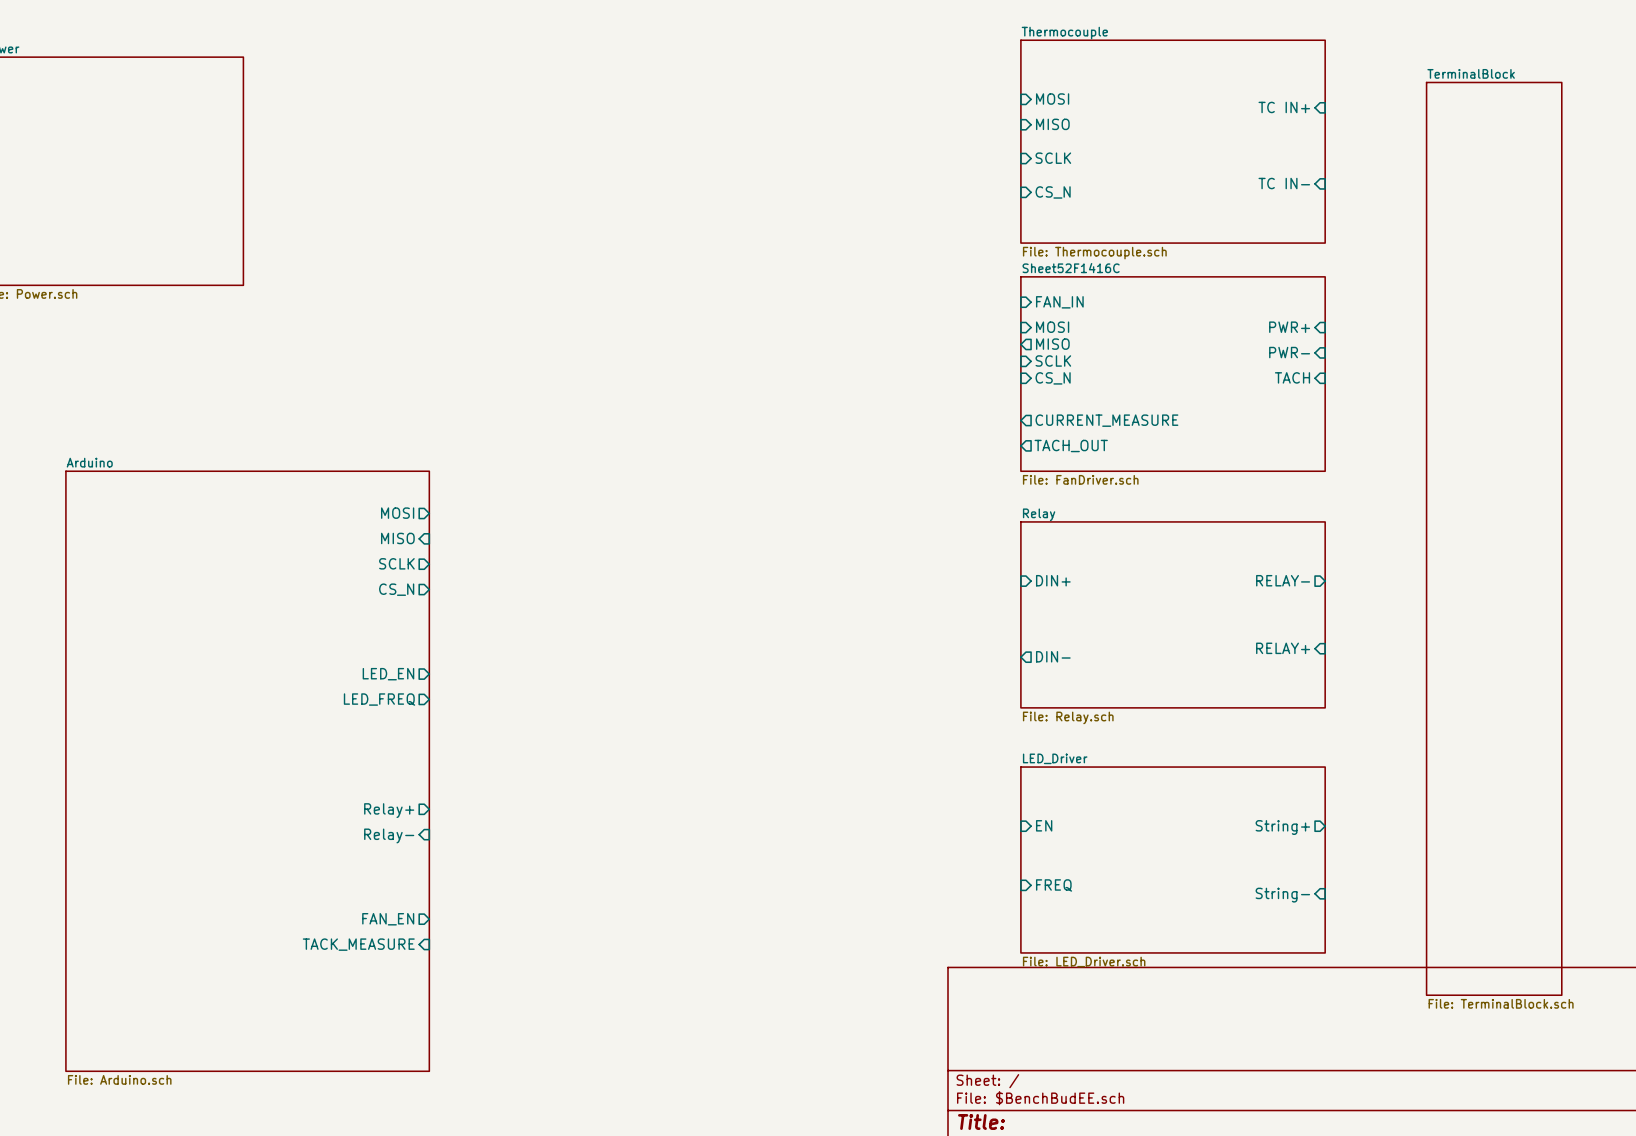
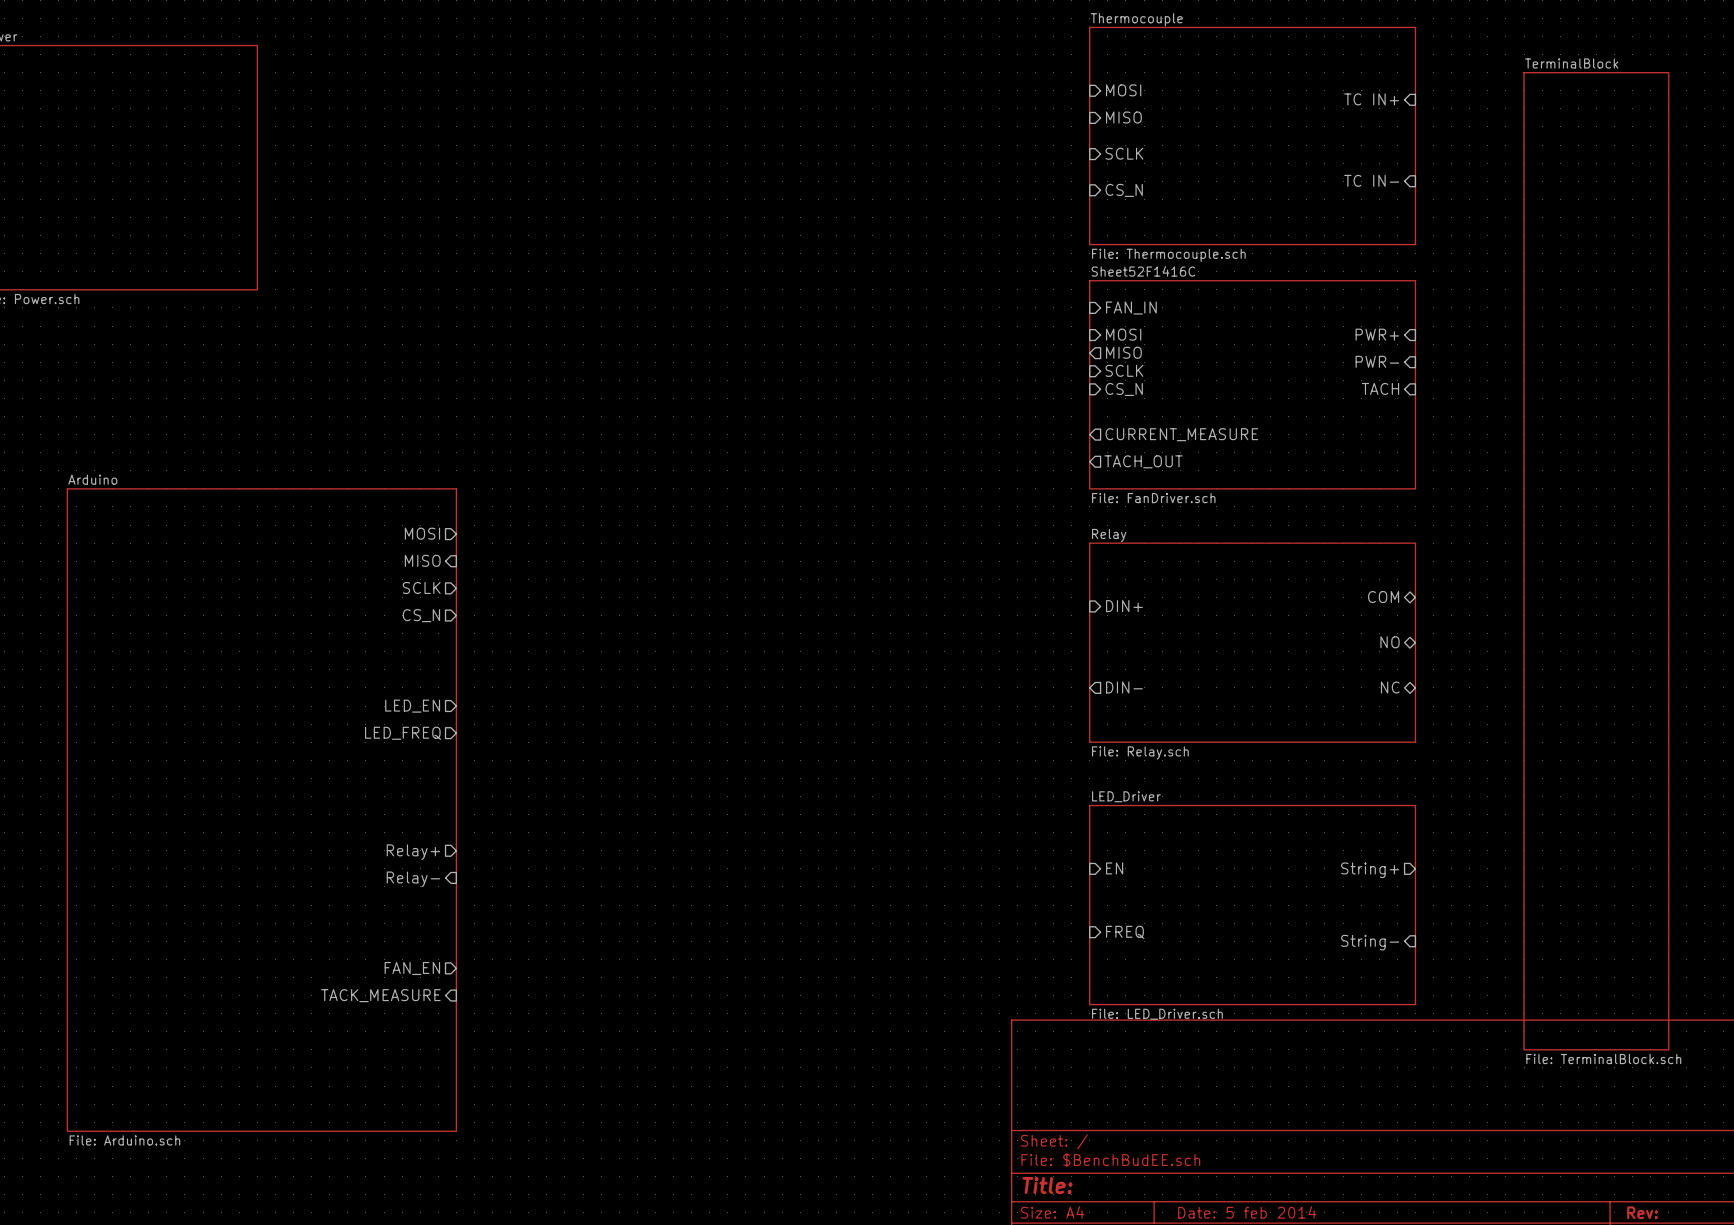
sheet pin: none -> COM (1383, 597)
sheet pin: RELAY- (1283, 580) -> none
sheet pin: none -> NO (1390, 642)
sheet pin: RELAY+ (1283, 648) -> none
sheet pin: none -> NC (1390, 687)

